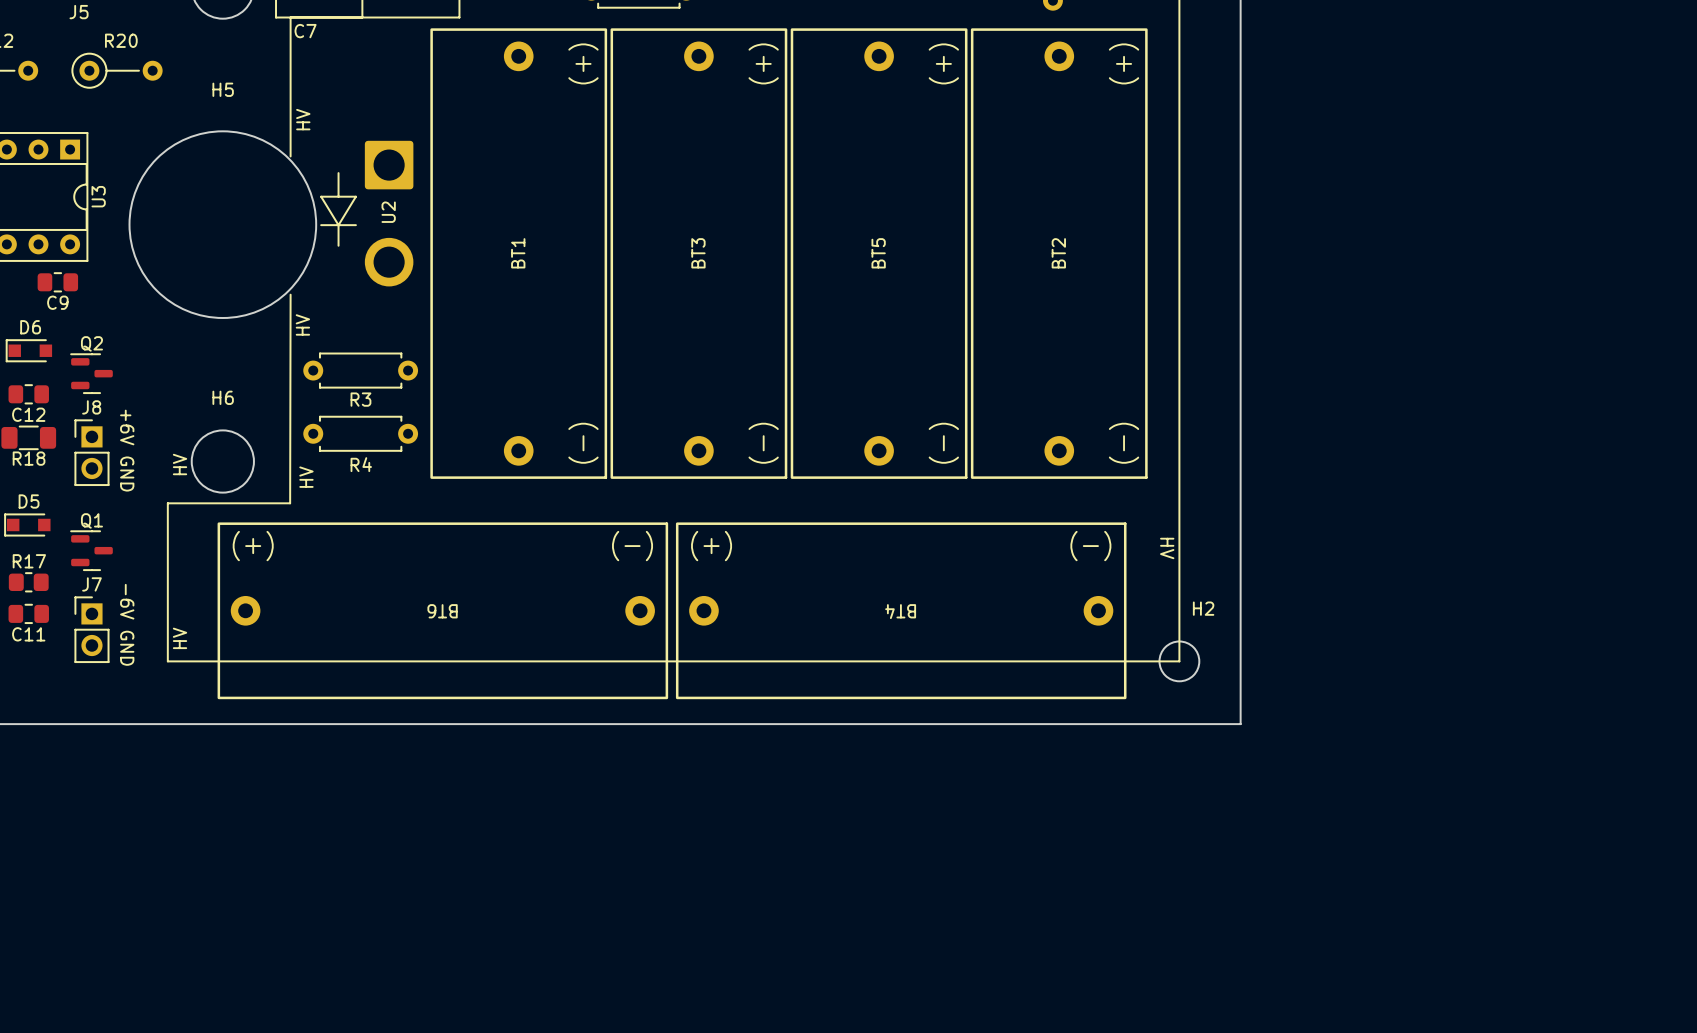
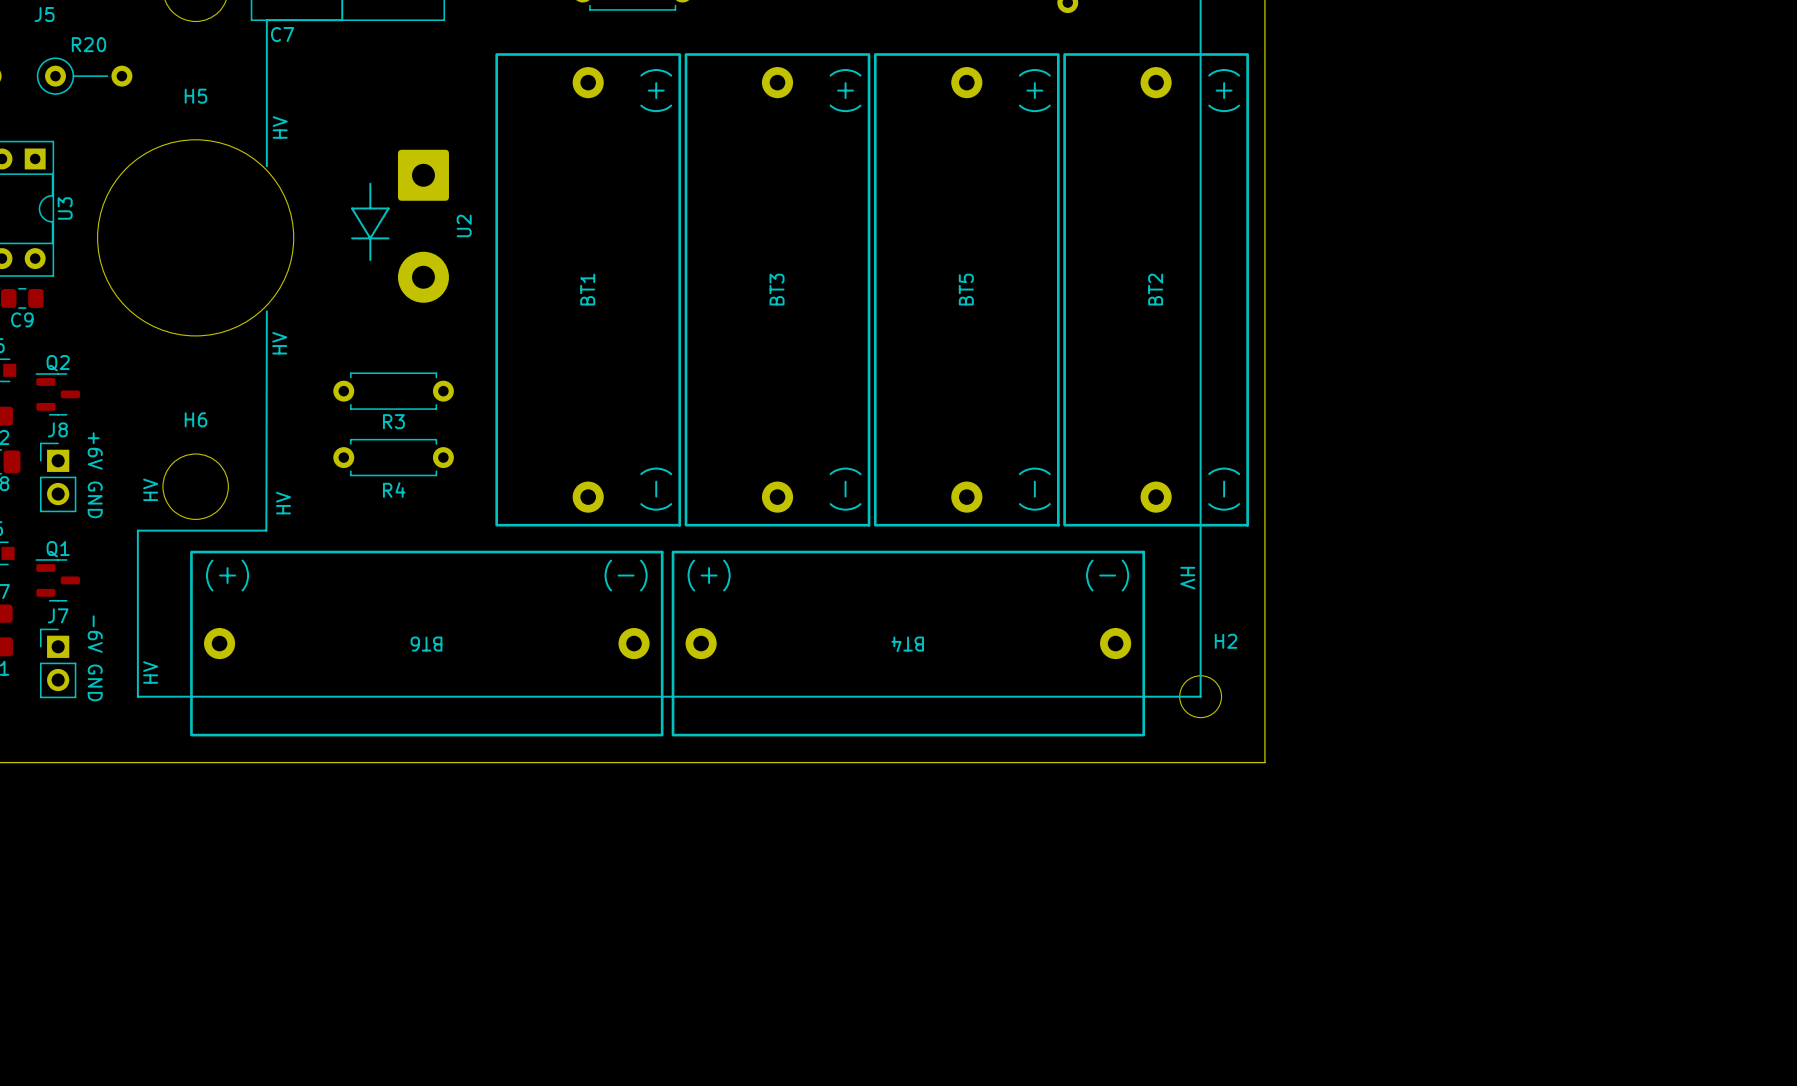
U2 footprint: [364, 140, 414, 287] -> [397, 149, 449, 303]
line: (338, 173) (338, 196) -> (370, 183) (370, 208)
U2 name position: U2 (388, 212) -> U2 (464, 225)
line: (321, 225) (355, 225) -> (352, 238) (388, 238)
line: (338, 225) (321, 196) (355, 196) (338, 225) -> (370, 238) (352, 208) (388, 208) (370, 238)
line: (338, 225) (338, 245) -> (370, 238) (370, 260)
BT1 position: (518, 253) -> (588, 289)
BT3 position: (698, 253) -> (777, 289)
BT5 position: (879, 253) -> (966, 289)
BT2 position: (1059, 253) -> (1156, 289)
R3 position: (360, 370) -> (393, 391)
R4 position: (360, 433) -> (393, 457)

